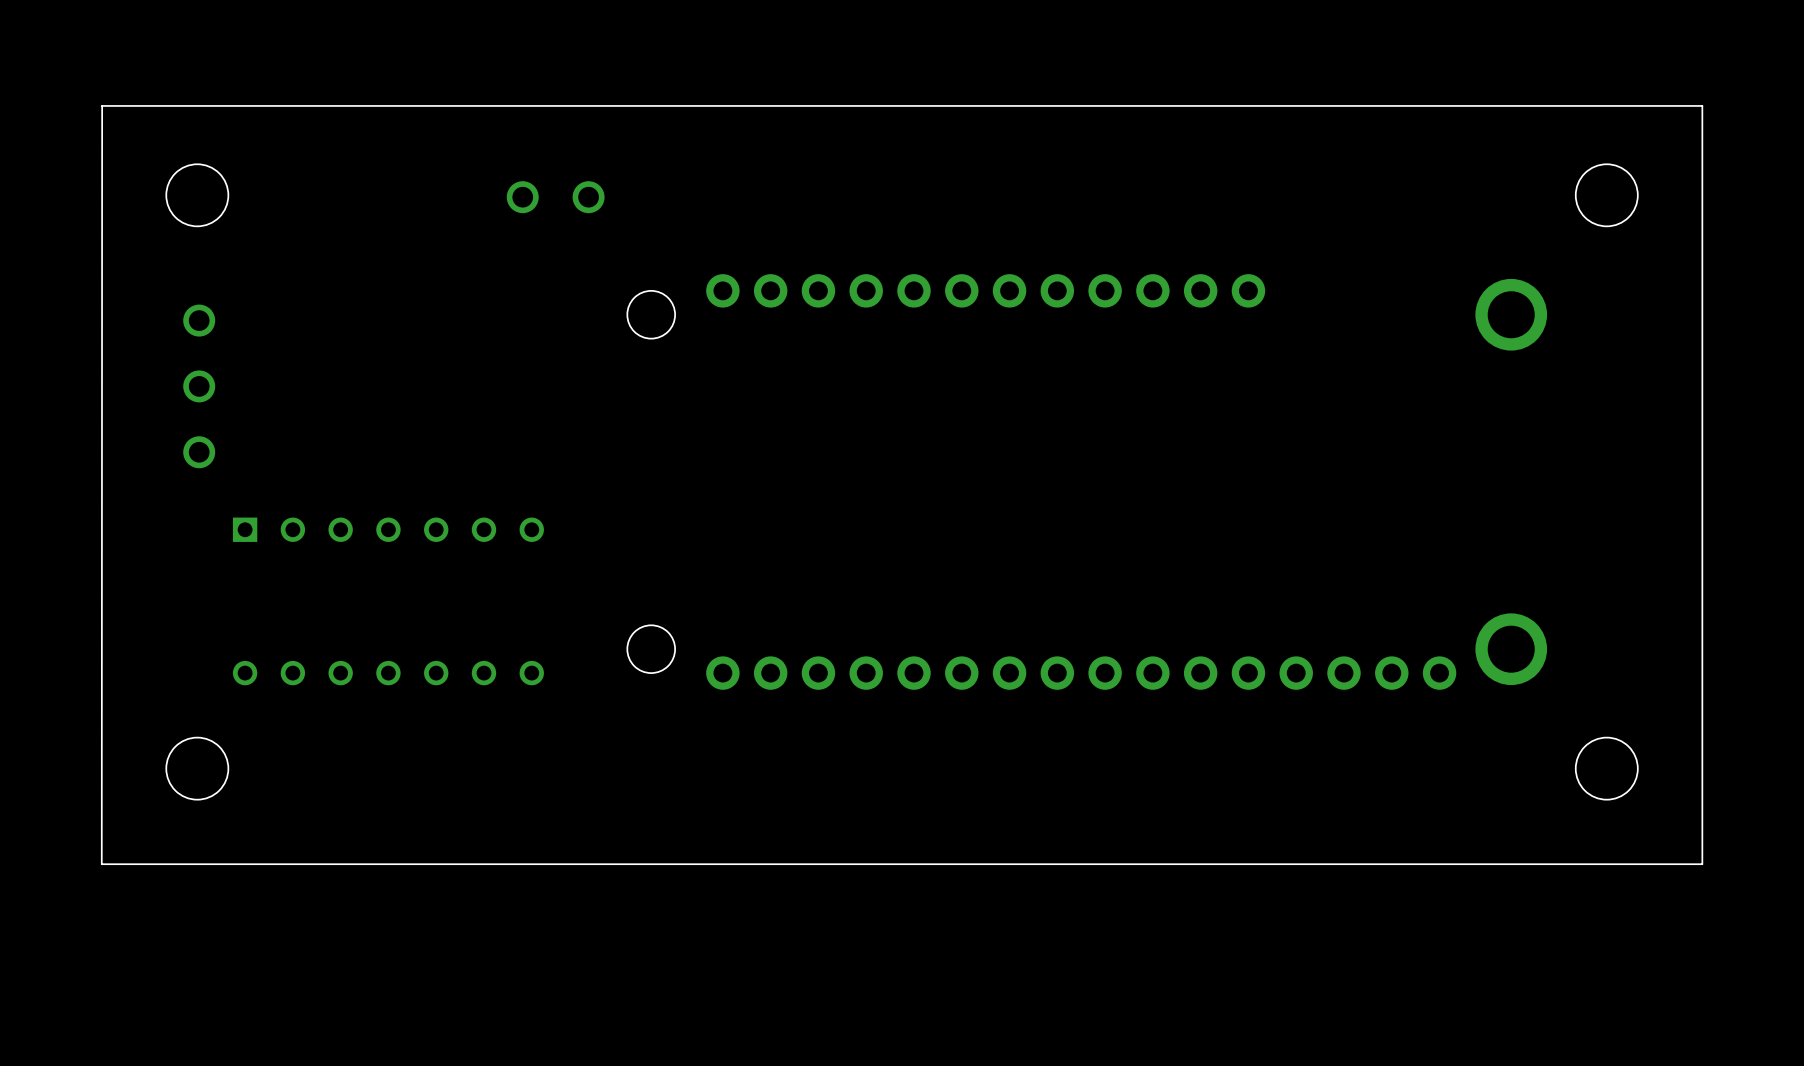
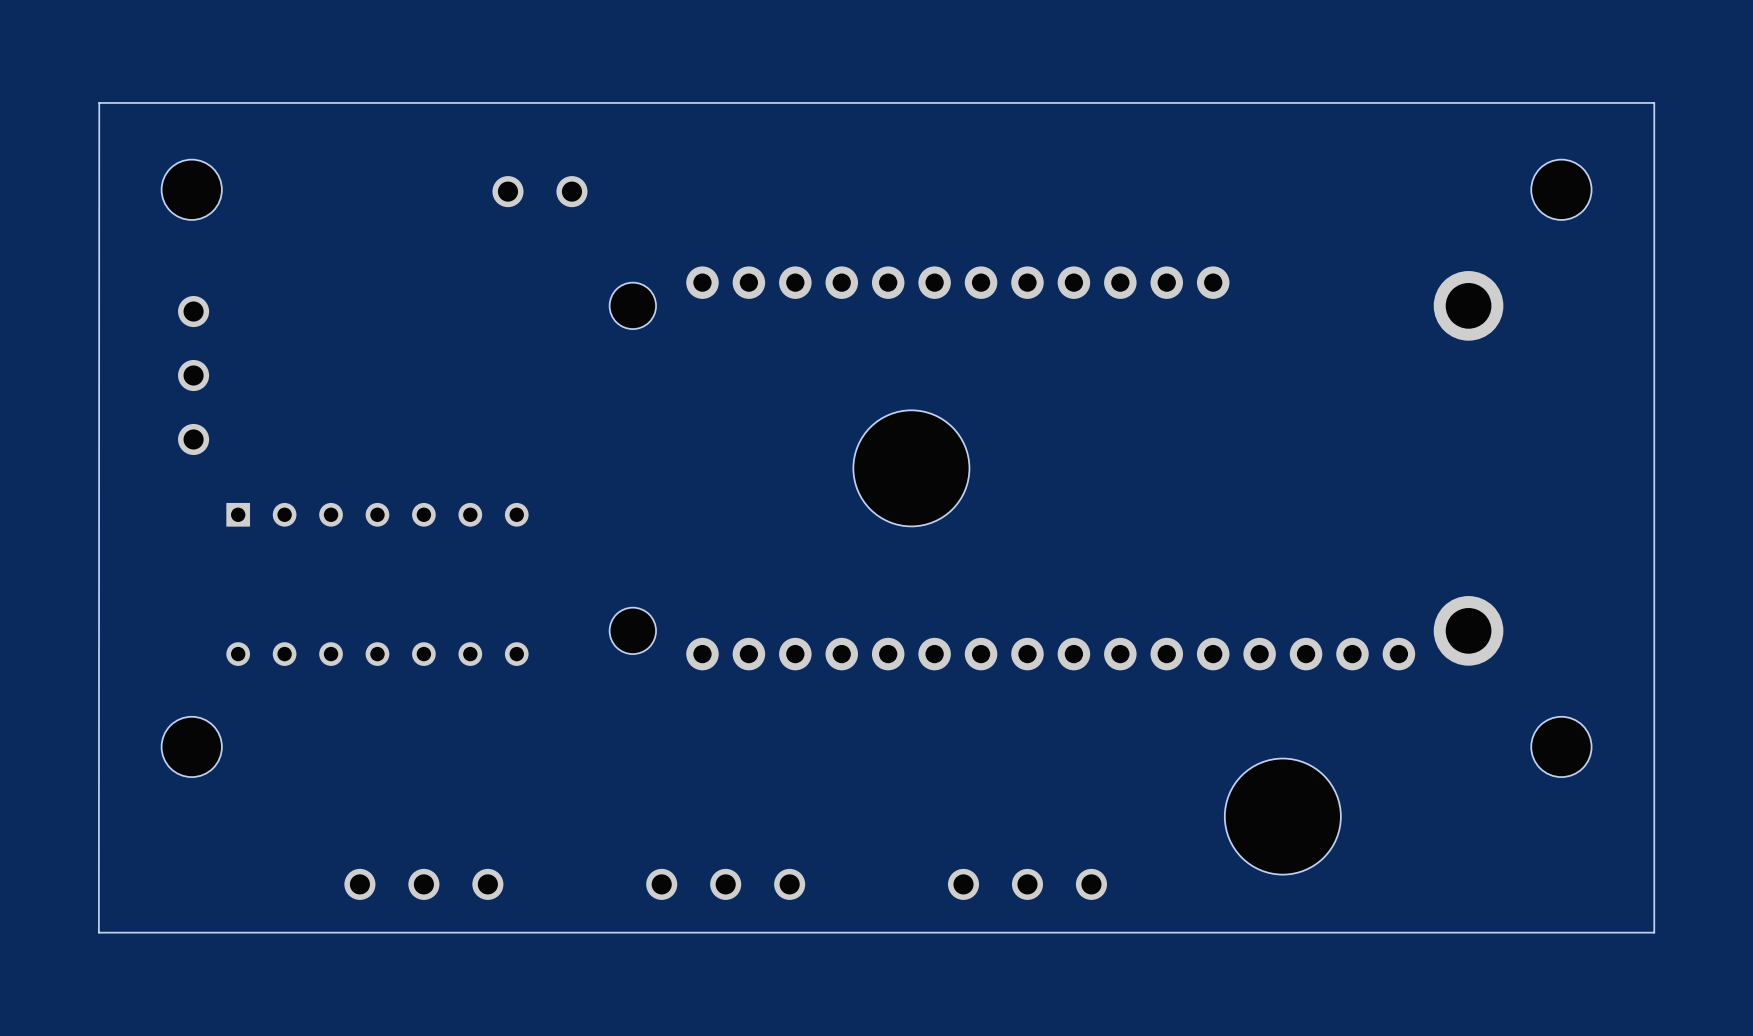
board edge: (102, 105) (101, 864) (1702, 864) -> (99, 102) (98, 932) (1654, 932) (1654, 839)
hole: none -> (911, 468)
hole: none -> (1282, 816)
part: none -> (423, 884)
part: none -> (725, 884)
part: none -> (1027, 884)

